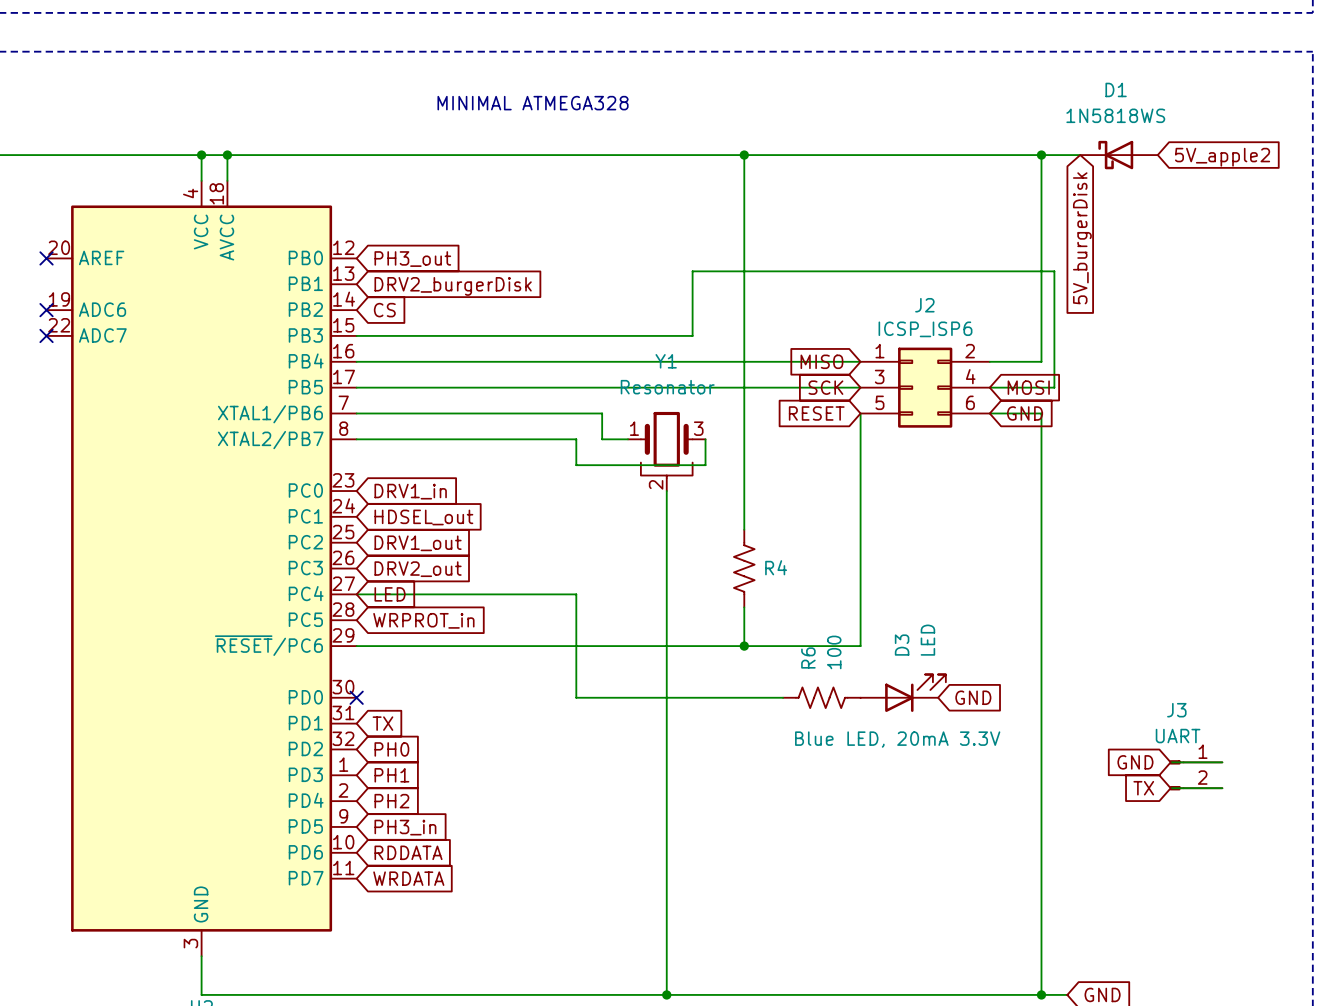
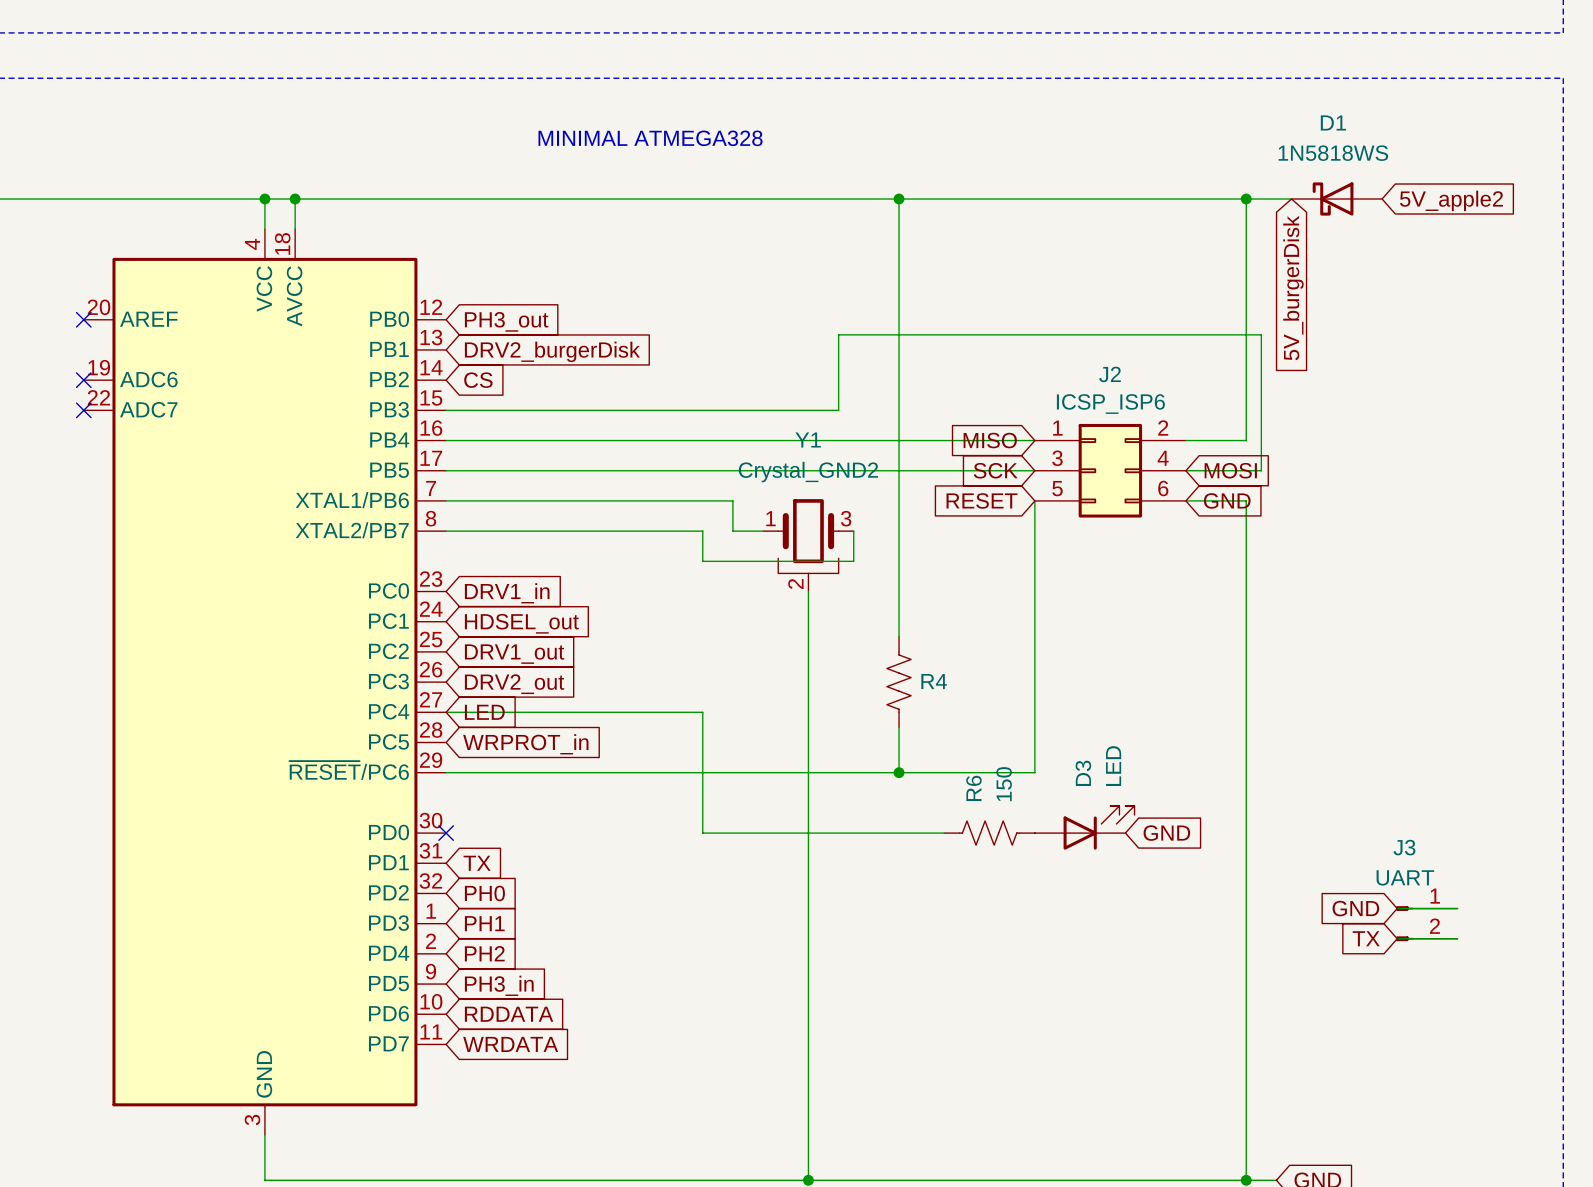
Y1 value: Resonator (667, 387) -> Crystal_GND2 (808, 472)
R6 value: 100 (834, 652) -> 150 (1004, 784)
D3 text: Blue LED, 20mA 3.3V (897, 739) -> none

